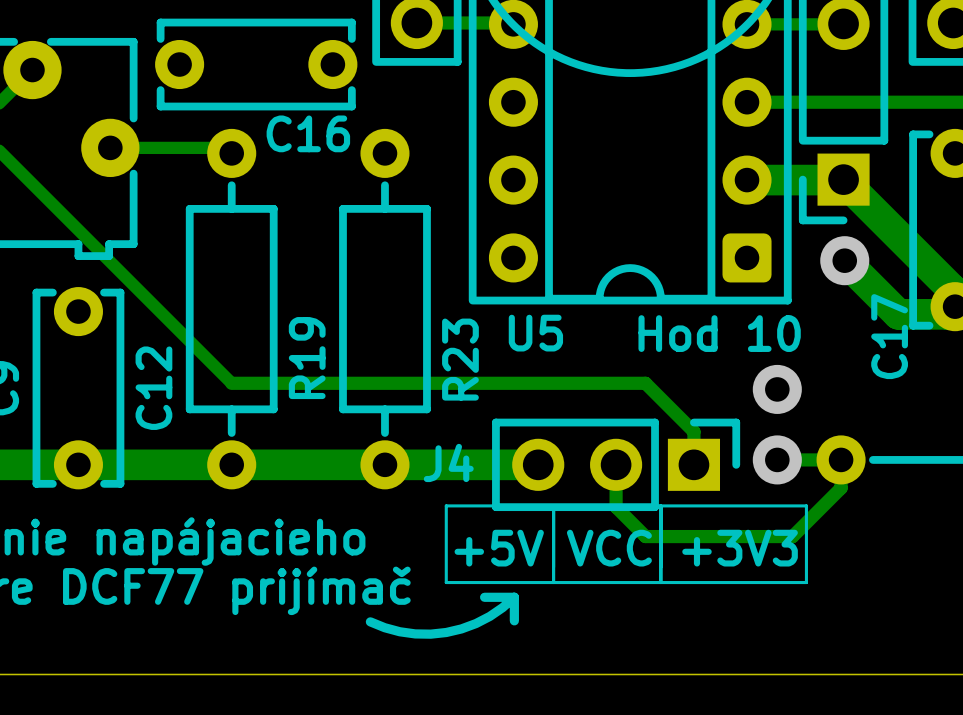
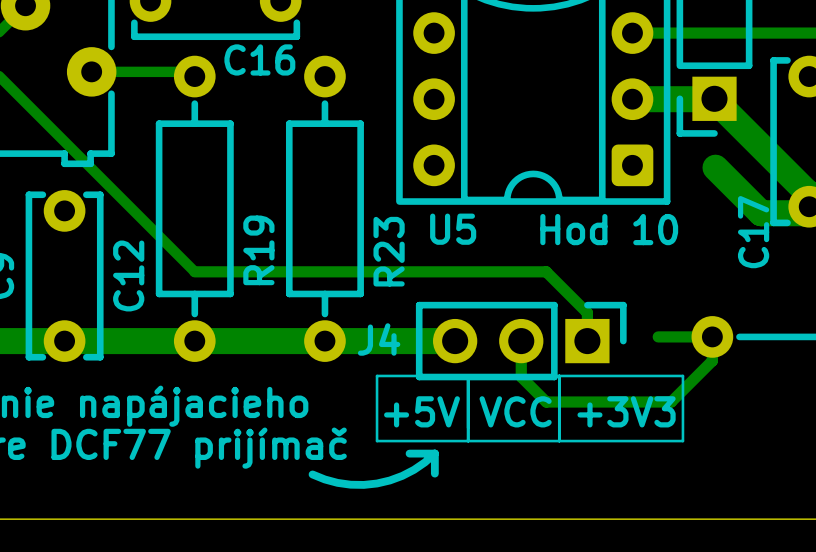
via: (844, 260) -> none
via: (777, 389) -> none
via: (777, 459) -> none

